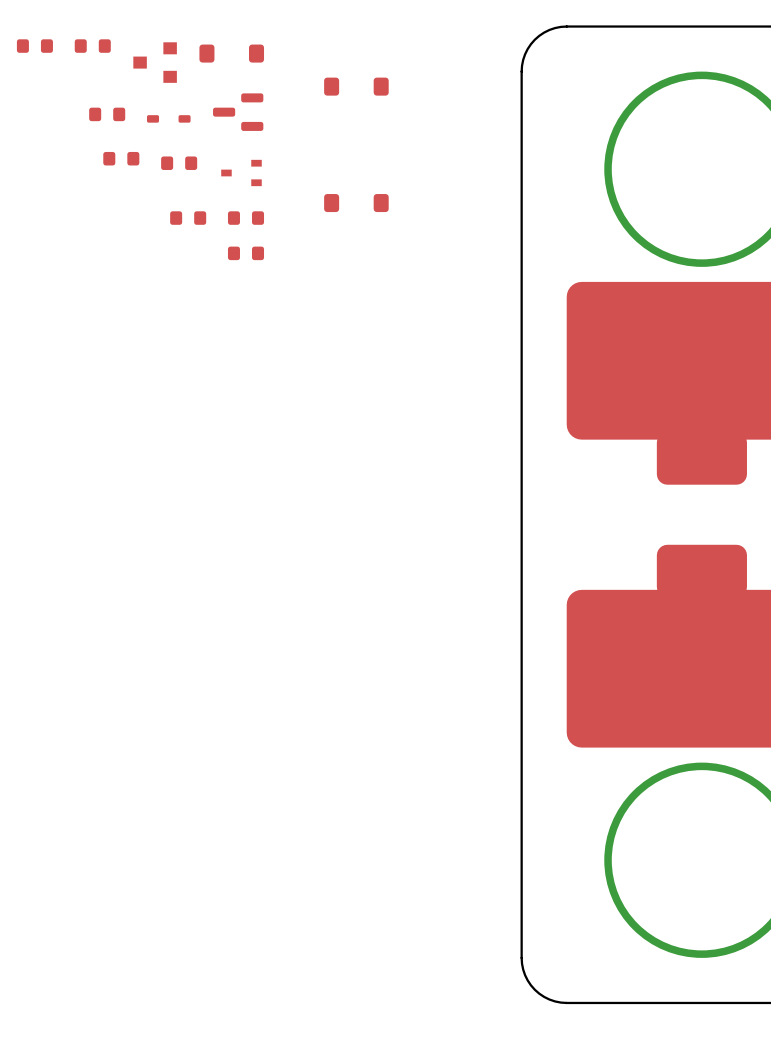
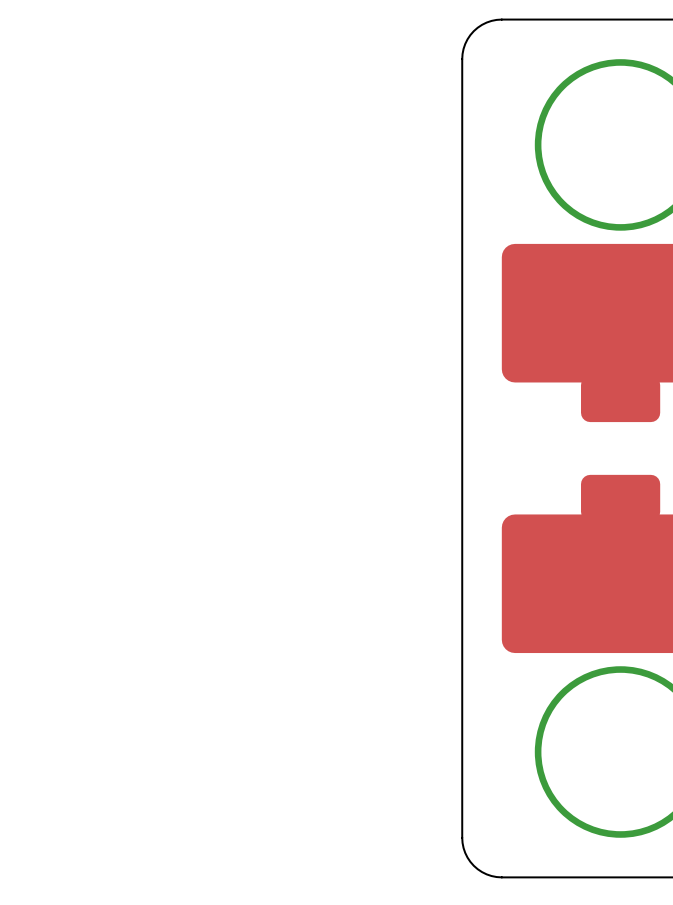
part: (34, 46) -> none
part: (92, 46) -> none
part: (231, 53) -> none
part: (155, 62) -> none
part: (356, 86) -> none
part: (238, 112) -> none
part: (107, 114) -> none
part: (168, 118) -> none
part: (121, 158) -> none
part: (179, 163) -> none
part: (241, 172) -> none
part: (356, 203) -> none
part: (188, 218) -> none
part: (245, 218) -> none
part: (245, 253) -> none

